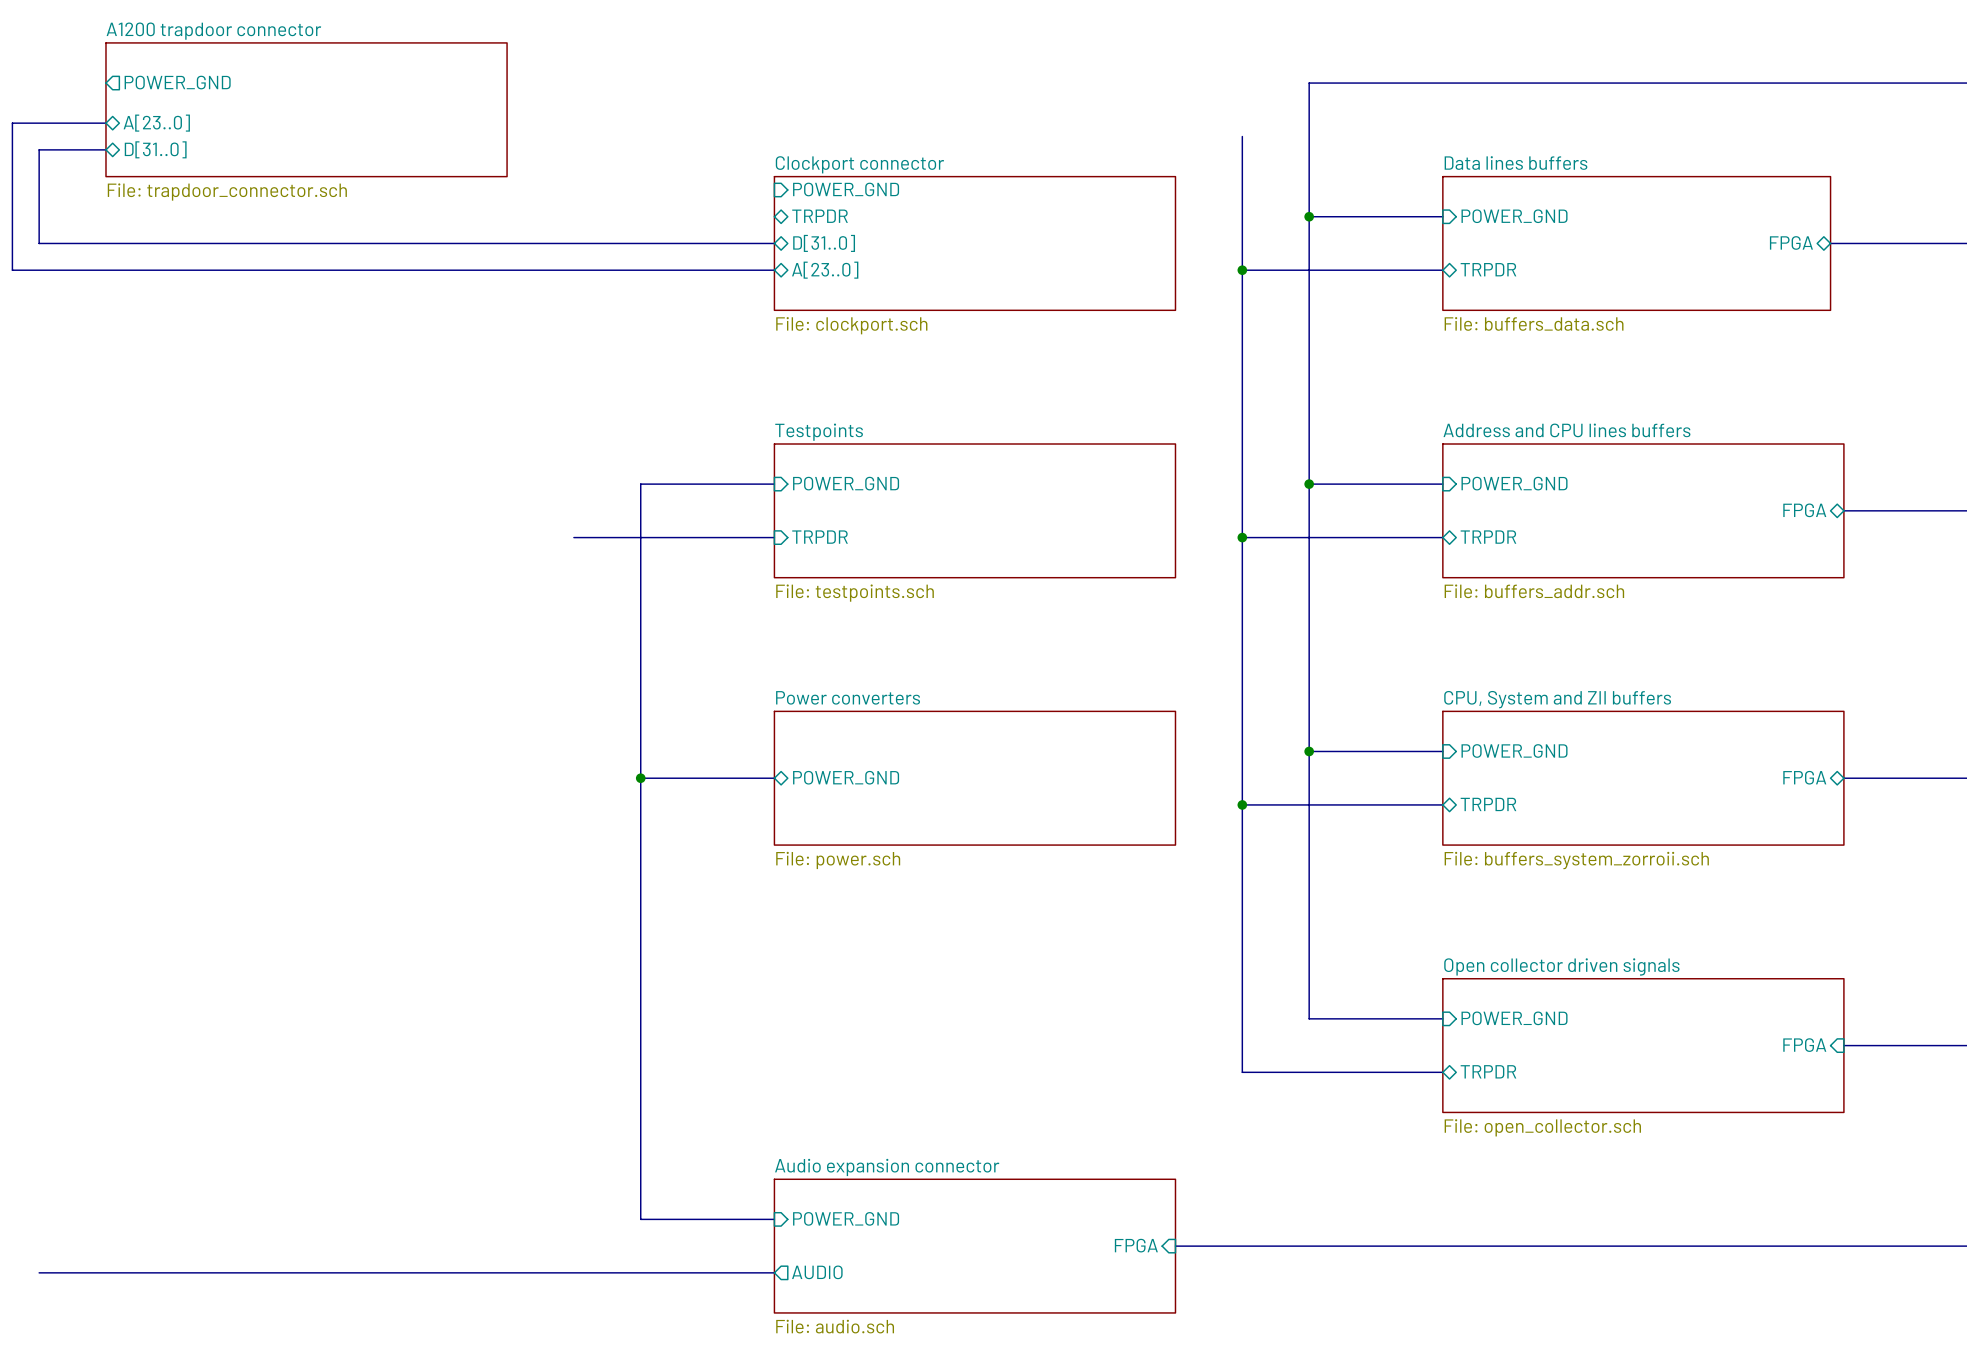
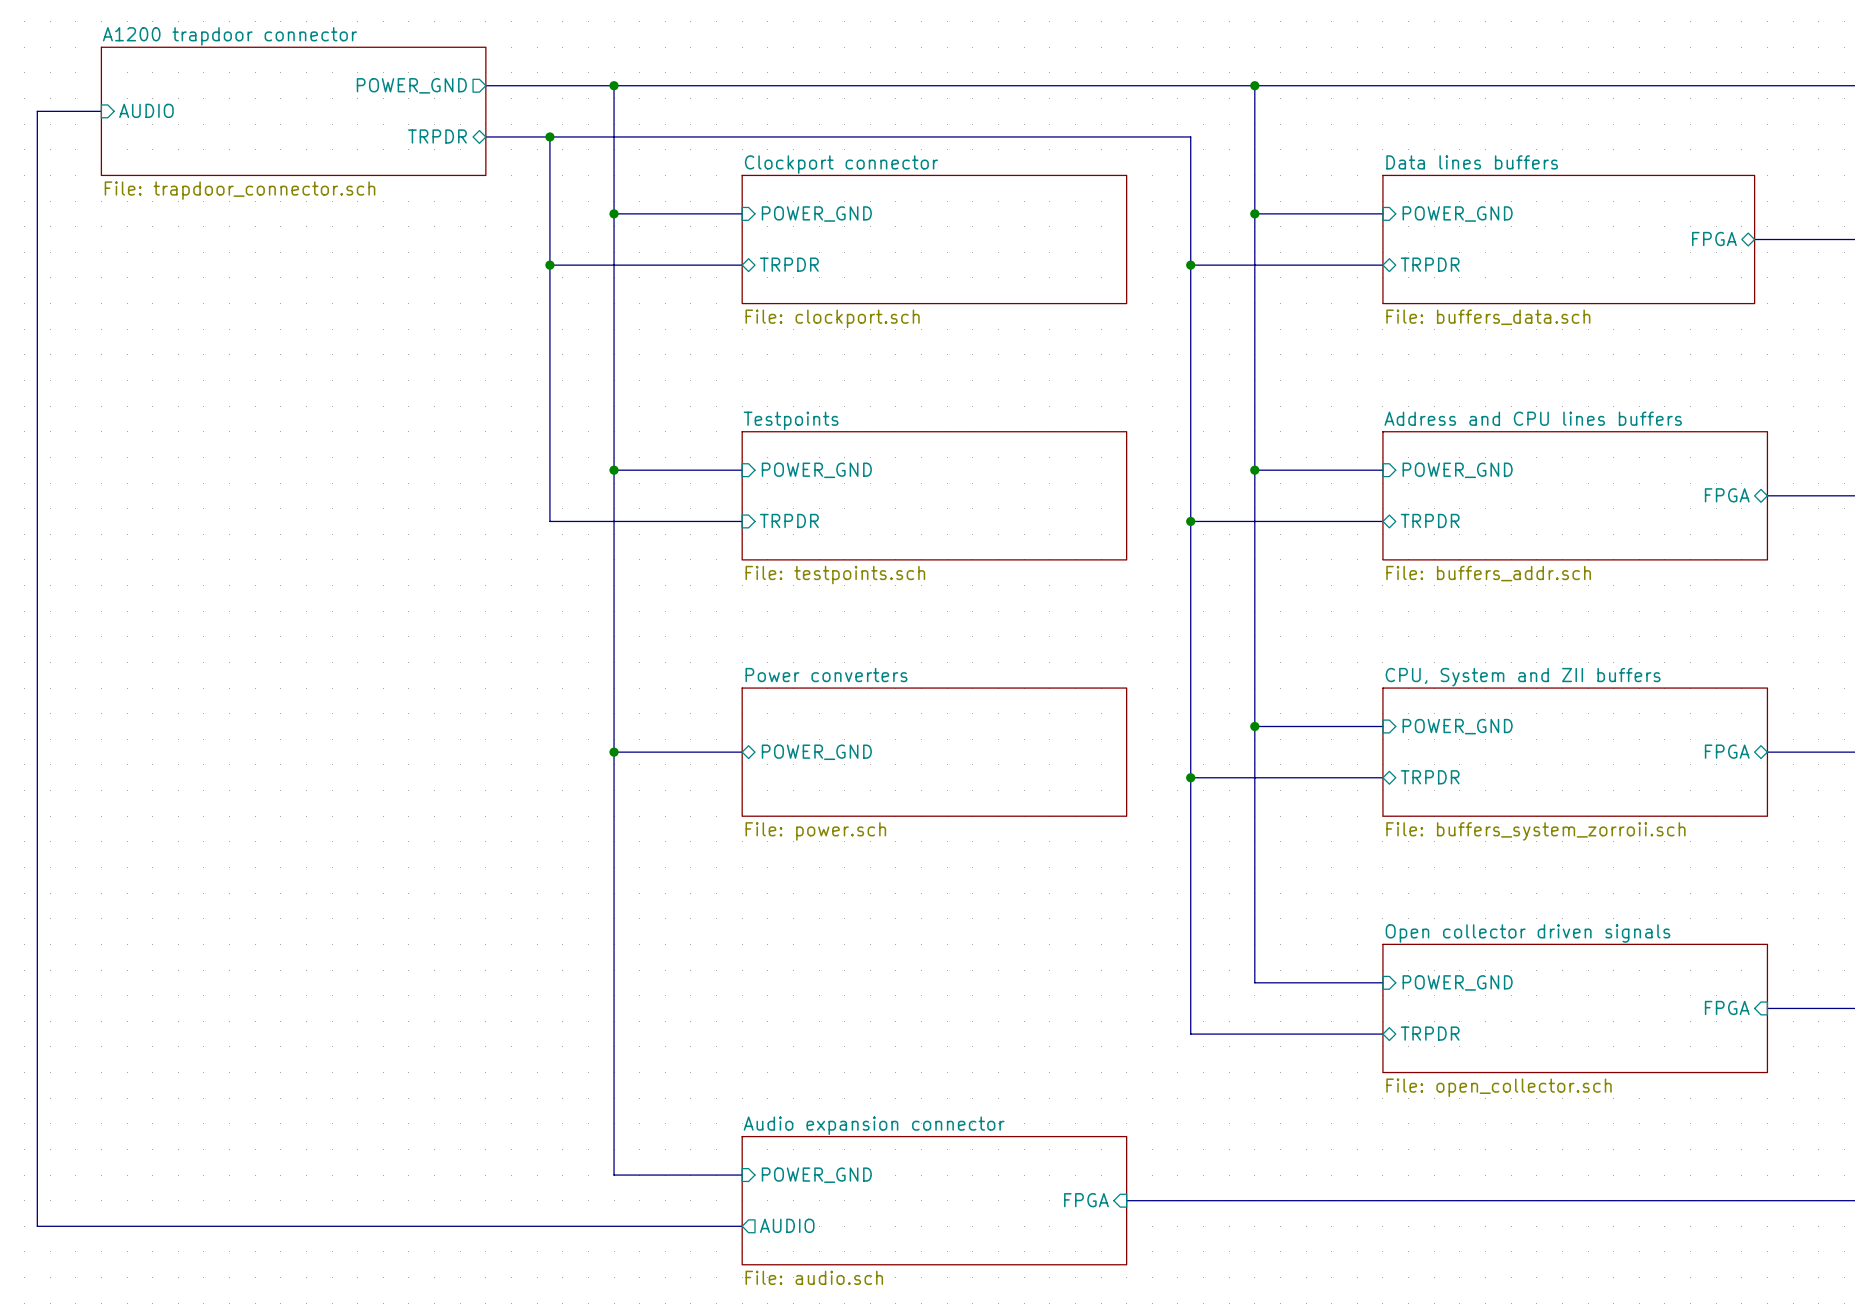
sheet pin: POWER_GND (177, 82) -> none
sheet pin: none -> POWER_GND (411, 85)
bus: none -> (485, 85) (1254, 85)
bus: none -> (614, 85) (614, 470)
junction: none -> (614, 85)
junction: none -> (1254, 85)
sheet pin: none -> AUDIO (146, 110)
bus: (105, 123) (12, 123) (12, 270) (573, 270) -> none
sheet pin: A[23..0] (156, 123) -> none
sheet pin: none -> TRPDR (437, 136)
bus: none -> (485, 136) (1190, 136)
bus: none -> (549, 136) (549, 521)
junction: none -> (549, 136)
bus: (39, 149) (105, 149) -> (37, 149) (37, 111) (101, 111)
sheet pin: D[31..0] (155, 149) -> none
sheet pin: POWER_GND (846, 189) -> none
bus: none -> (614, 213) (742, 213)
junction: none -> (614, 213)
sheet pin shape: bidirectional (820, 216) -> input (816, 214)
sheet pin: TRPDR (820, 216) -> POWER_GND (816, 214)
bus: (39, 243) (774, 243) -> (37, 239) (37, 1226)
sheet pin: D[31..0] (824, 243) -> none
junction: none -> (549, 265)
sheet pin: A[23..0] (825, 270) -> TRPDR (789, 264)
junction: none -> (614, 470)

